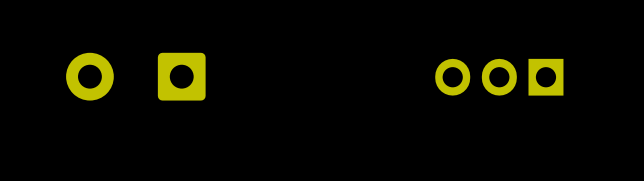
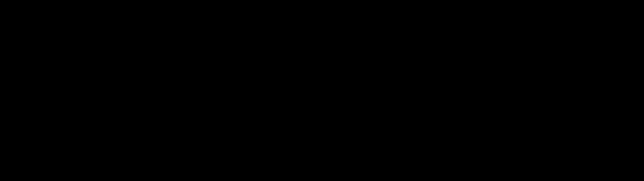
part: (135, 76) -> none
part: (499, 77) -> none

